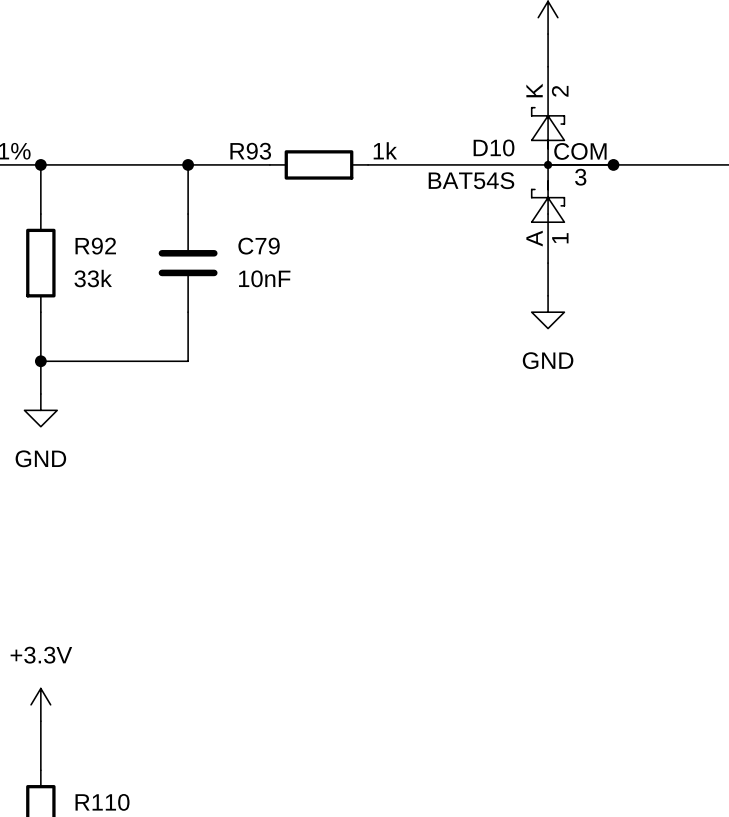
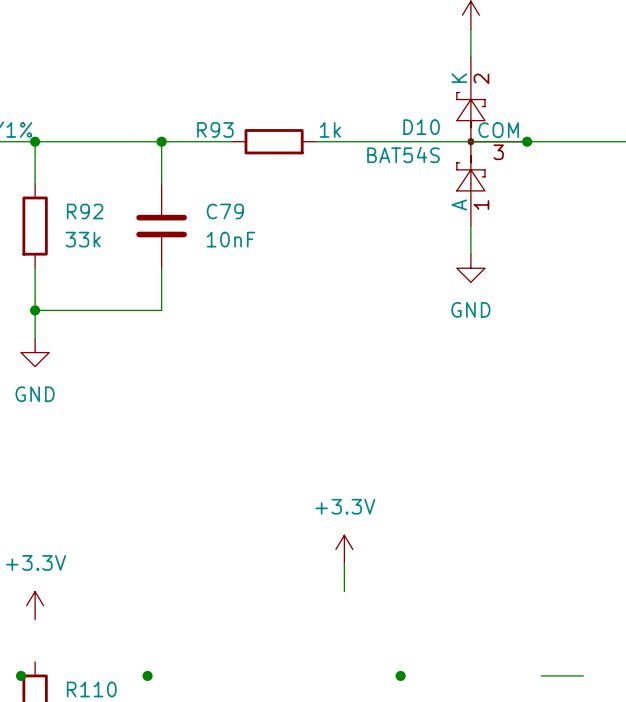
power symbol: none -> +3.3V (344, 549)
wire: none -> (344, 563) (344, 591)
wire: (40, 721) (40, 770) -> none
junction: none -> (21, 675)
junction: none -> (147, 675)
junction: none -> (400, 675)
wire: none -> (541, 675) (583, 675)

